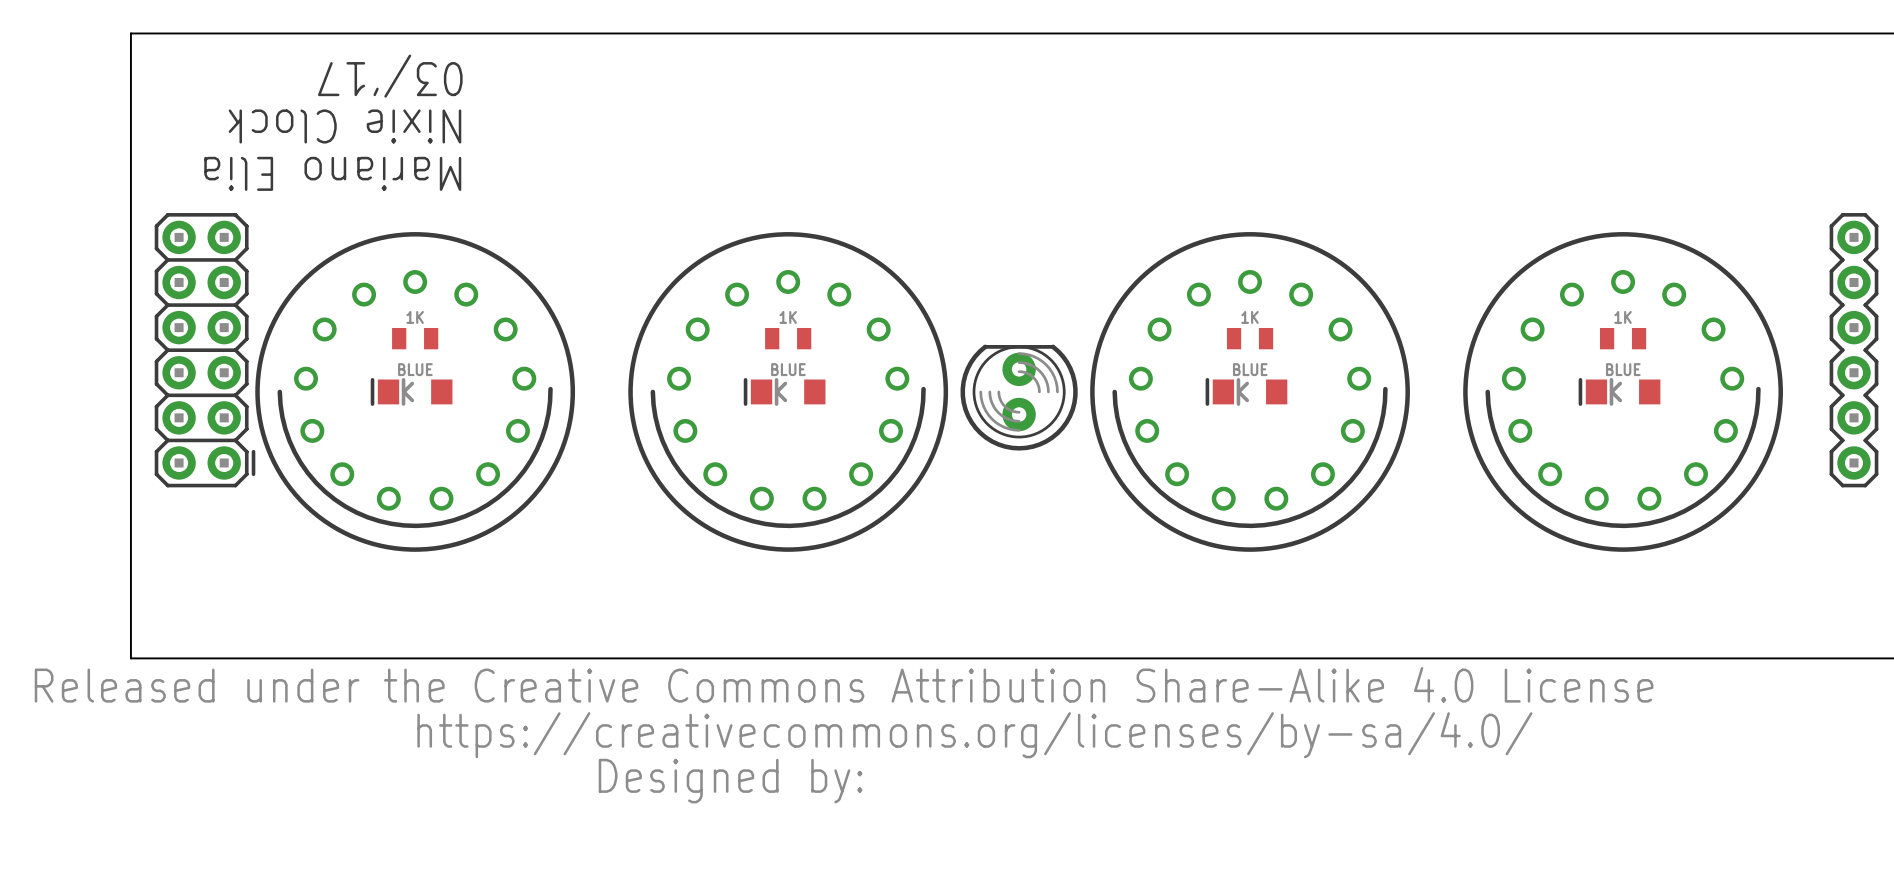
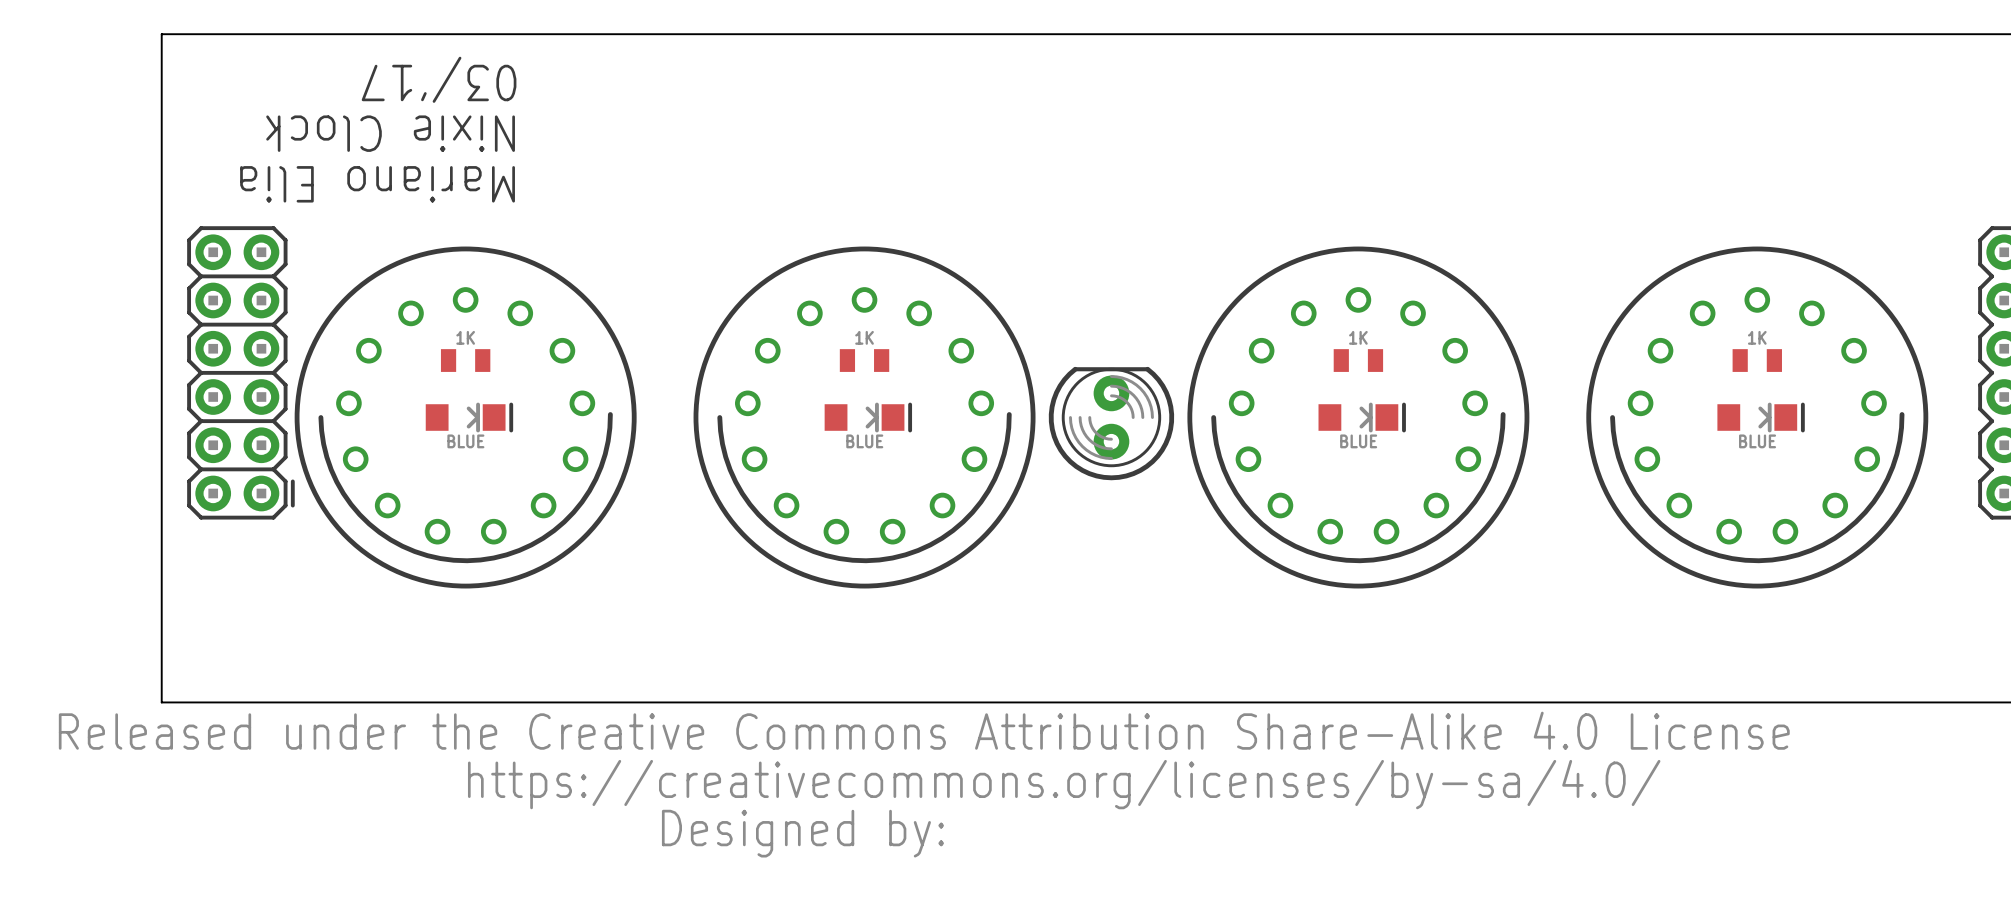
part rotation: 0° (411, 391) -> 180° (469, 417)
part rotation: 0° (784, 391) -> 180° (868, 417)
part rotation: 0° (1246, 391) -> 180° (1362, 417)
part rotation: 0° (1619, 391) -> 180° (1761, 417)

